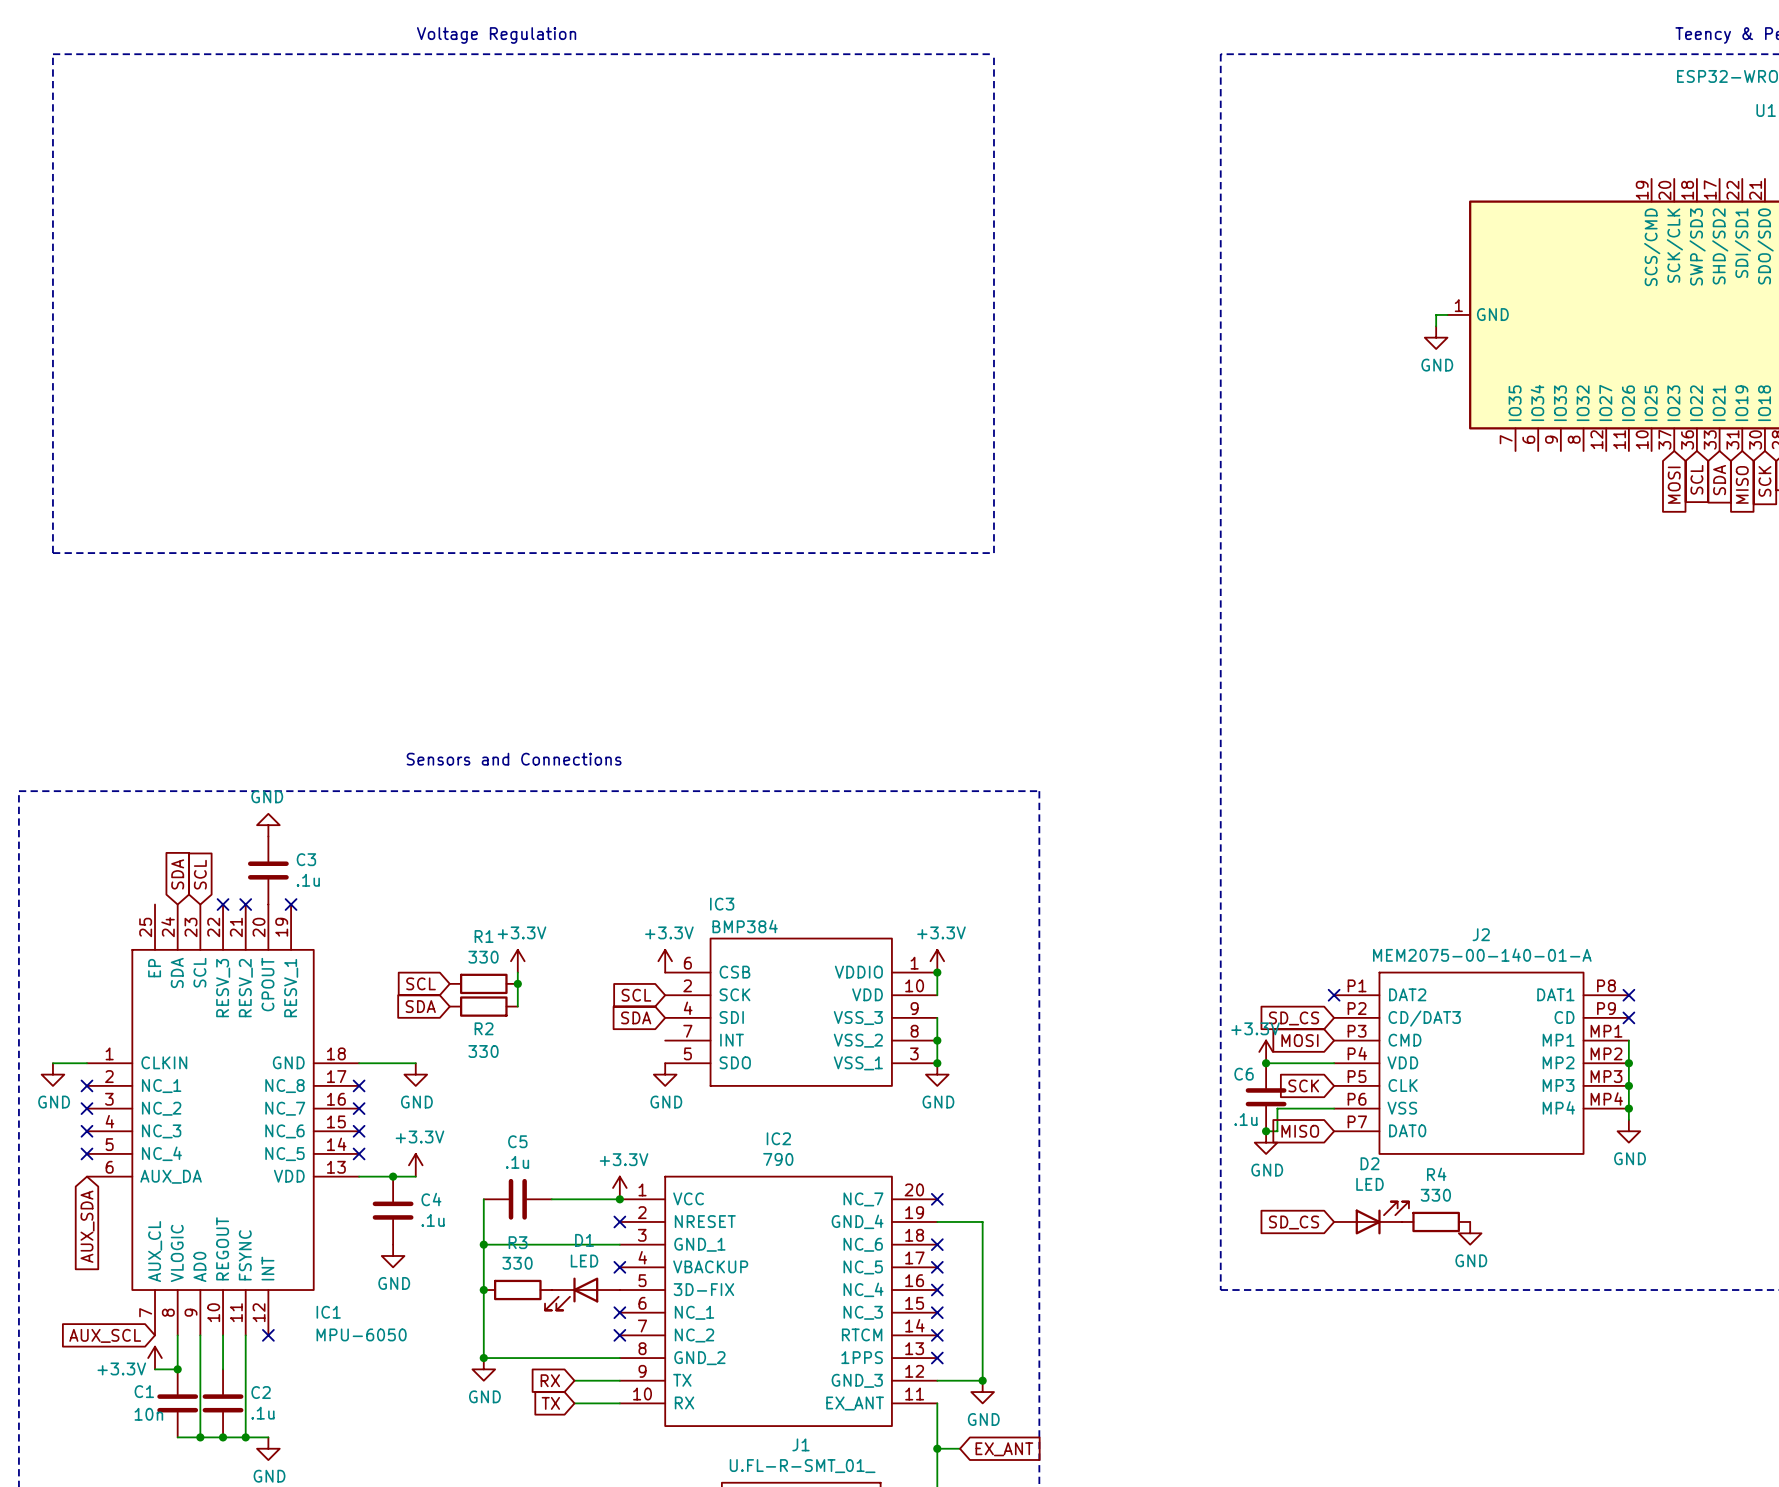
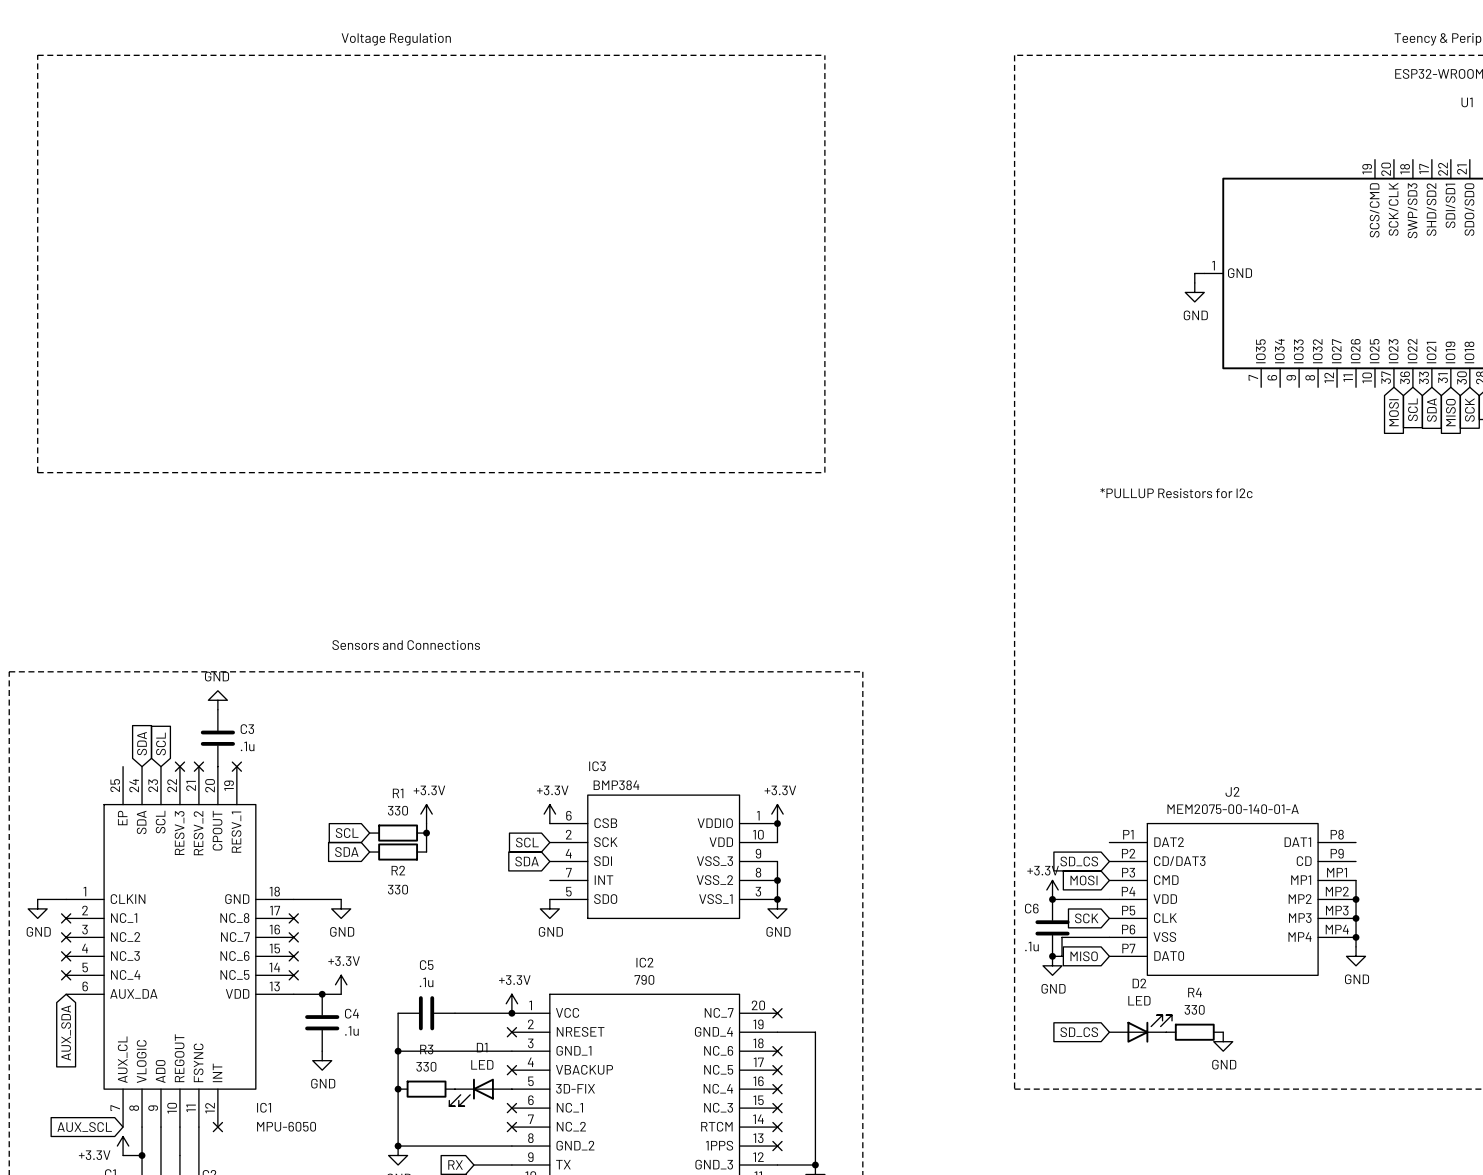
text: none -> *PULLUP Resistors for I2c (1176, 493)
no-connect mark: (1334, 995) -> none
no-connect mark: (1628, 995) -> none
no-connect mark: (1628, 1017) -> none

